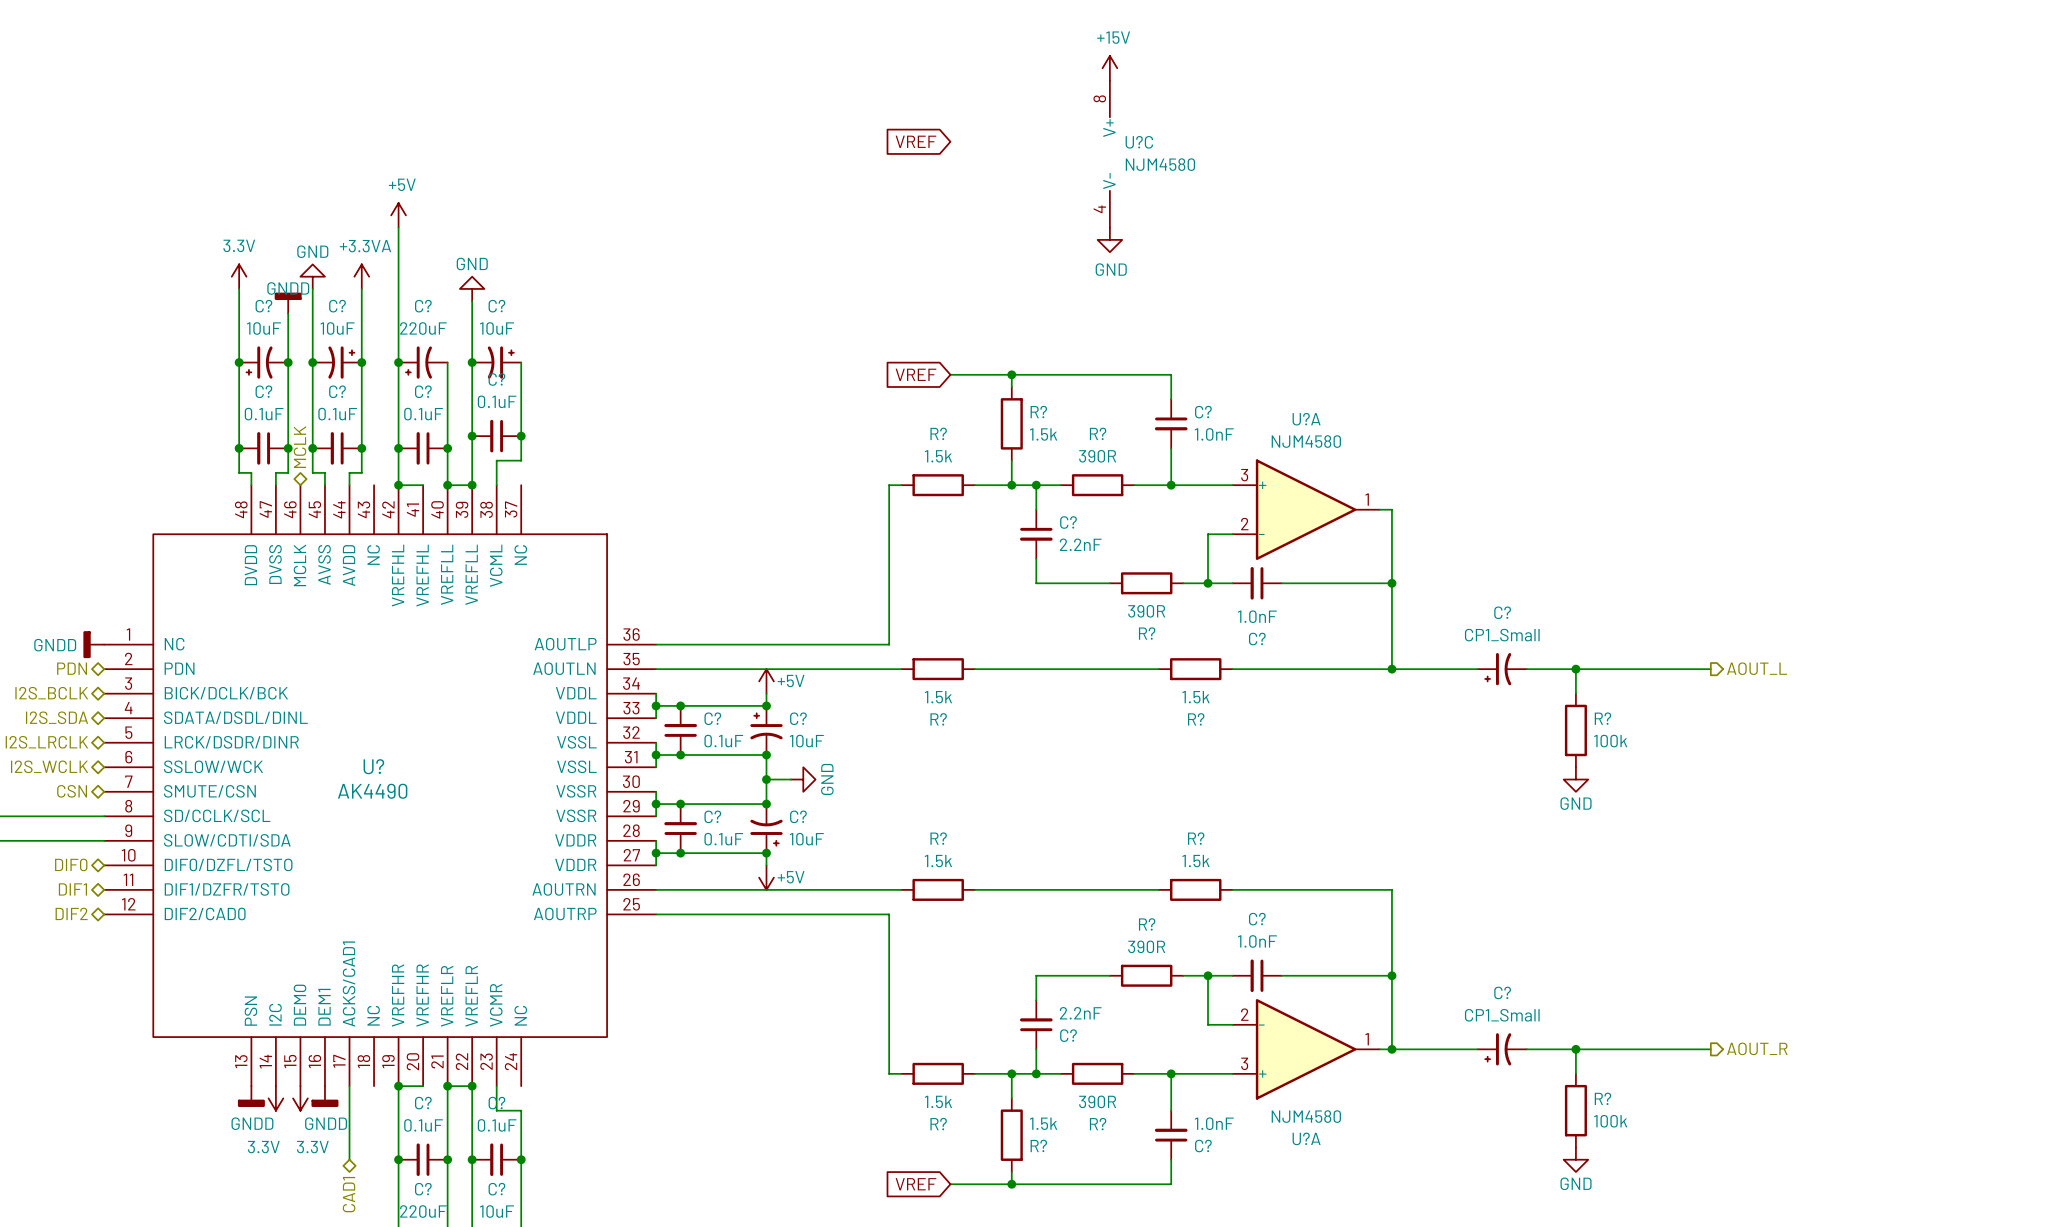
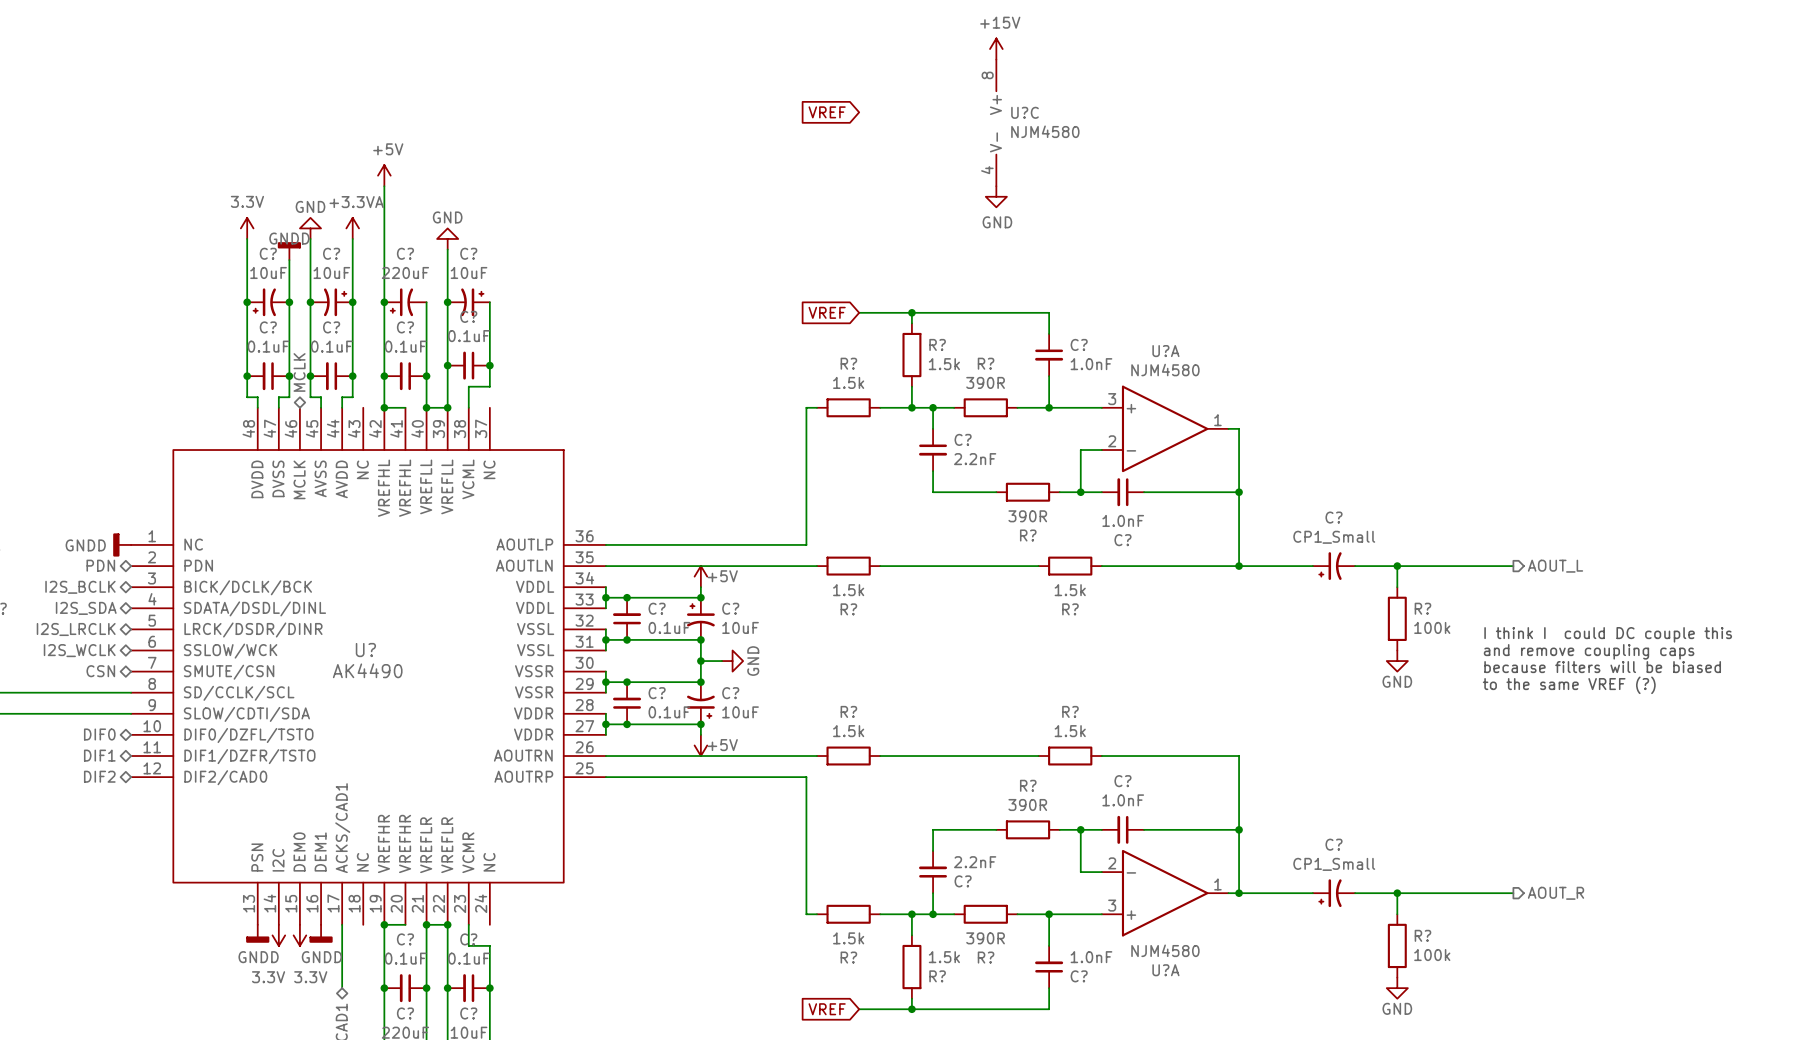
text: none -> I think I could DC couple this (1608, 634)
text: none -> and remove coupling caps (1589, 651)
text: none -> because filters will be biased (1602, 667)
text: none -> to the same VREF (?) (1569, 685)

